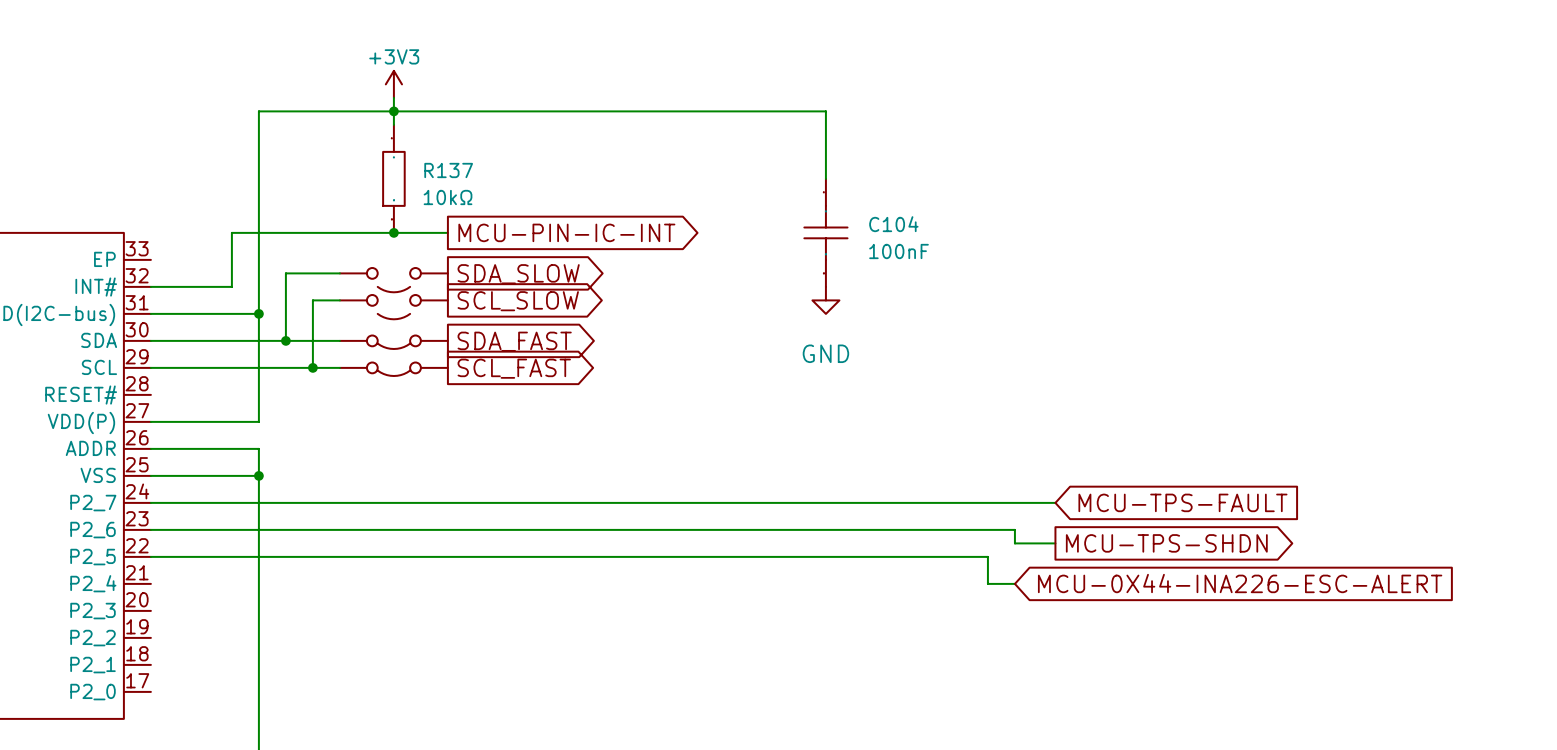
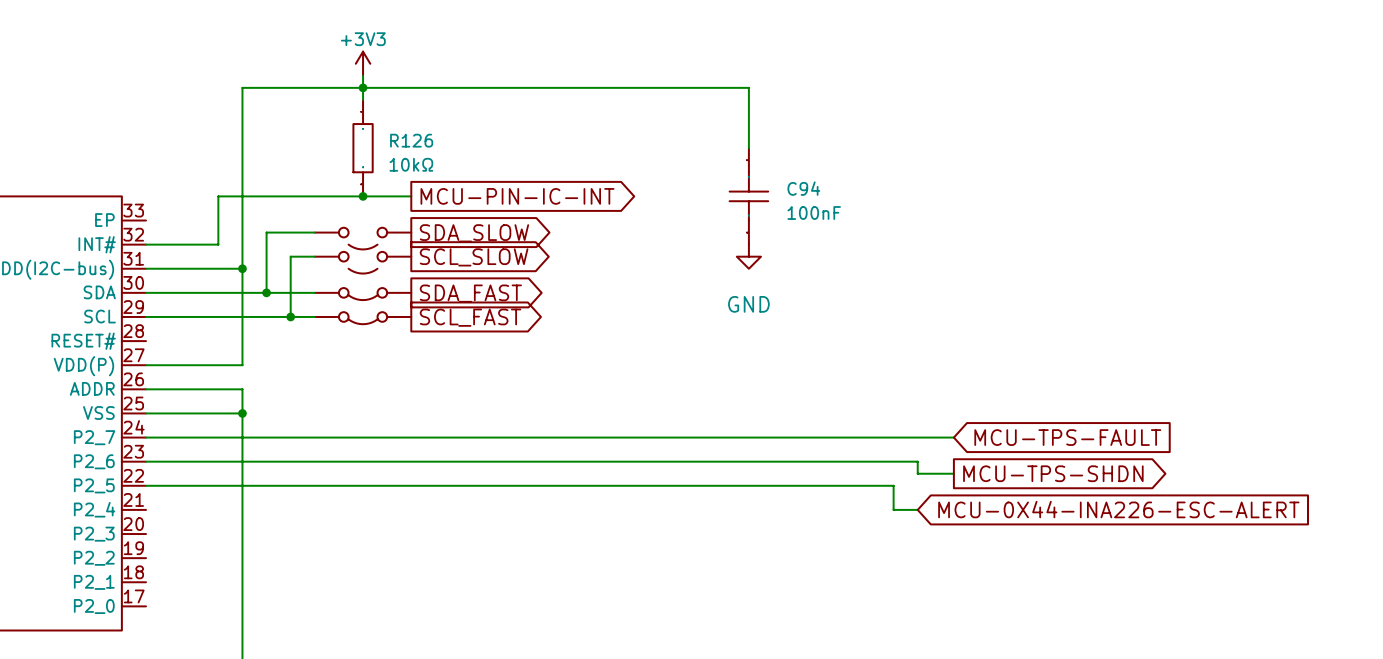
R137 name: R137 (448, 170) -> R126 (411, 140)
C104 name: C104 (893, 224) -> C94 (803, 188)

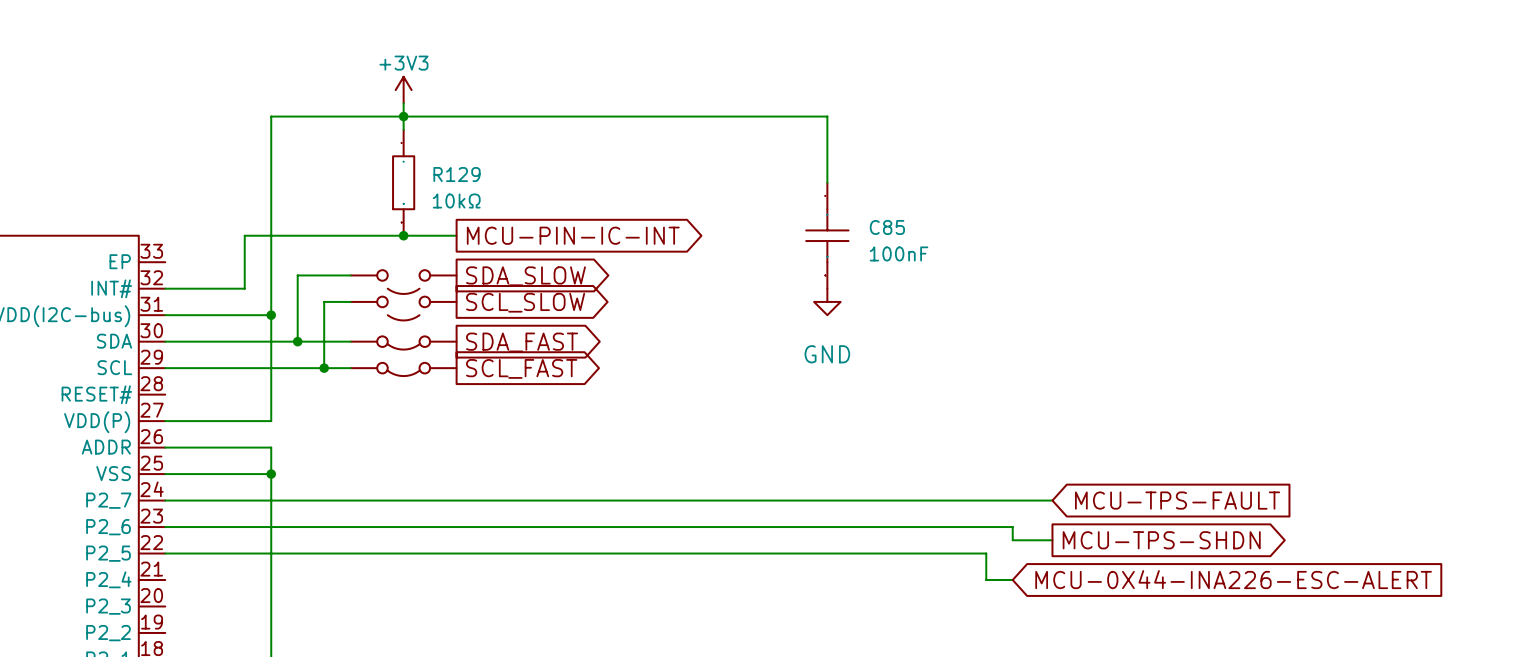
R126 name: R126 (411, 140) -> R129 (457, 174)
C94 name: C94 (803, 188) -> C85 (887, 227)

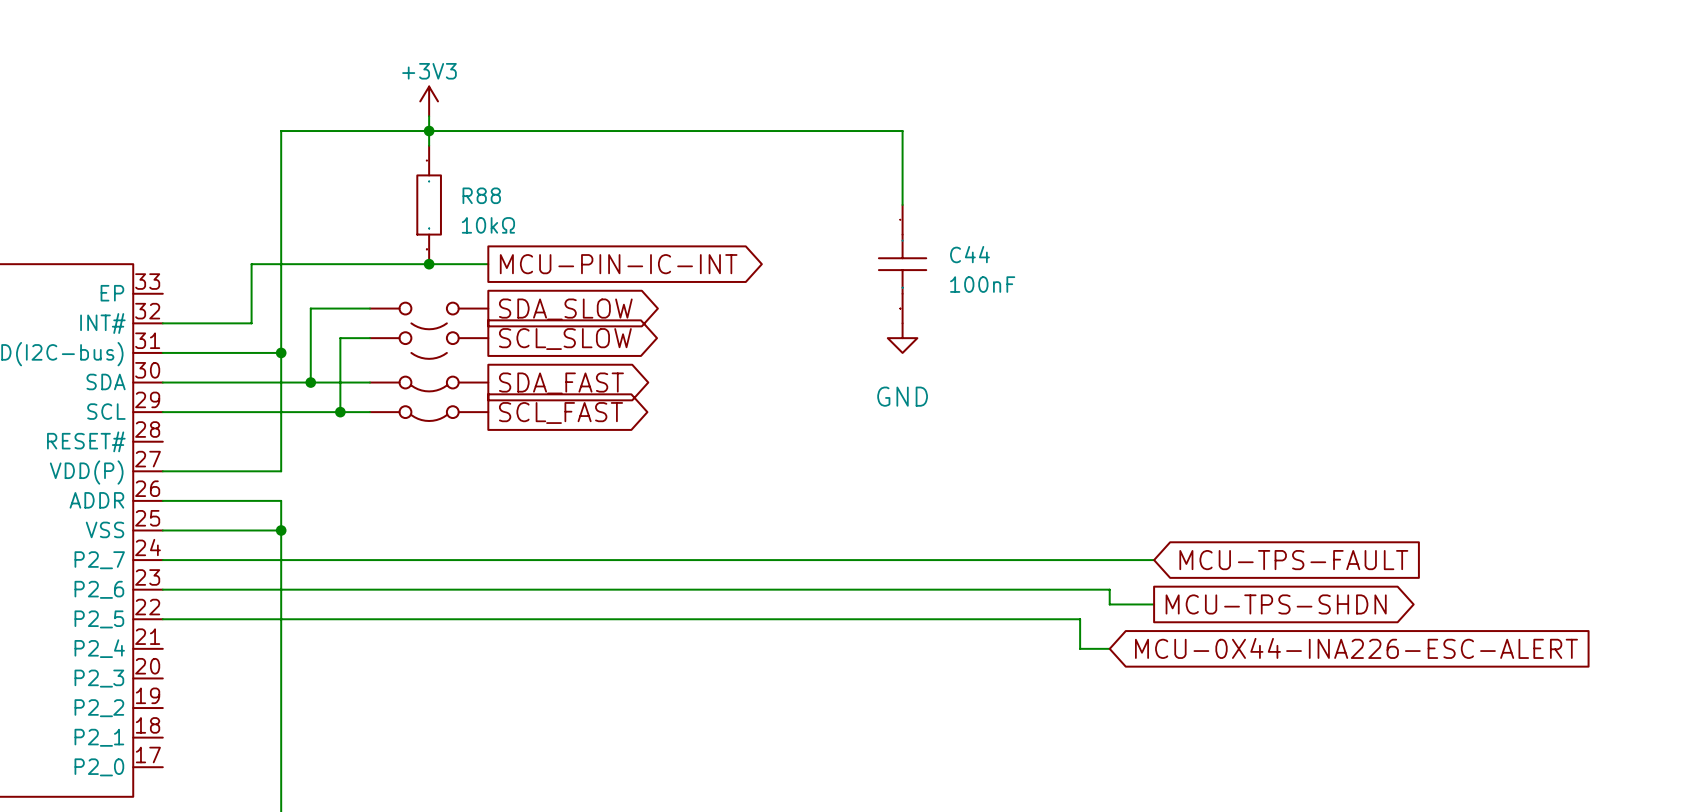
R129 name: R129 (457, 174) -> R88 (481, 195)
C85 name: C85 (887, 227) -> C44 (969, 254)

